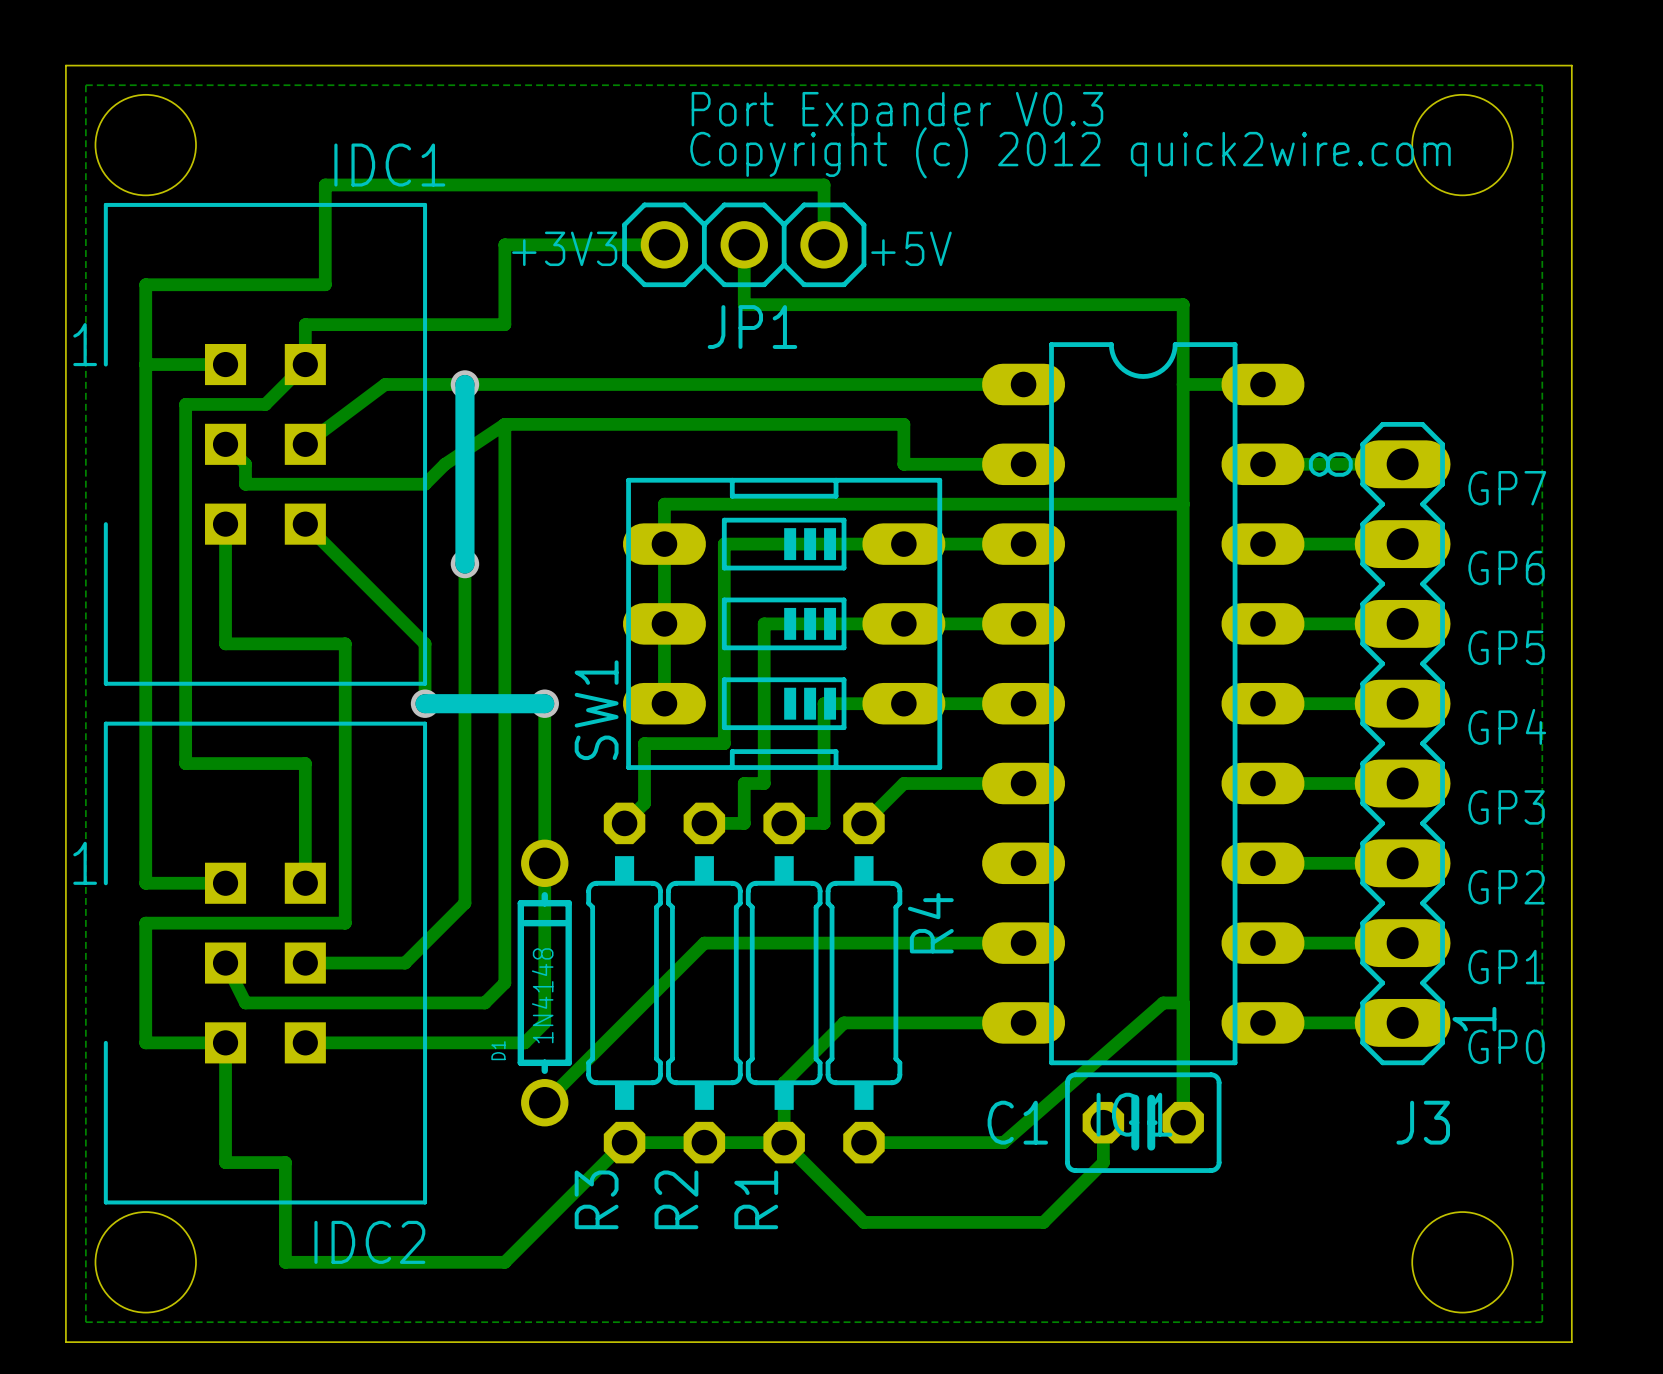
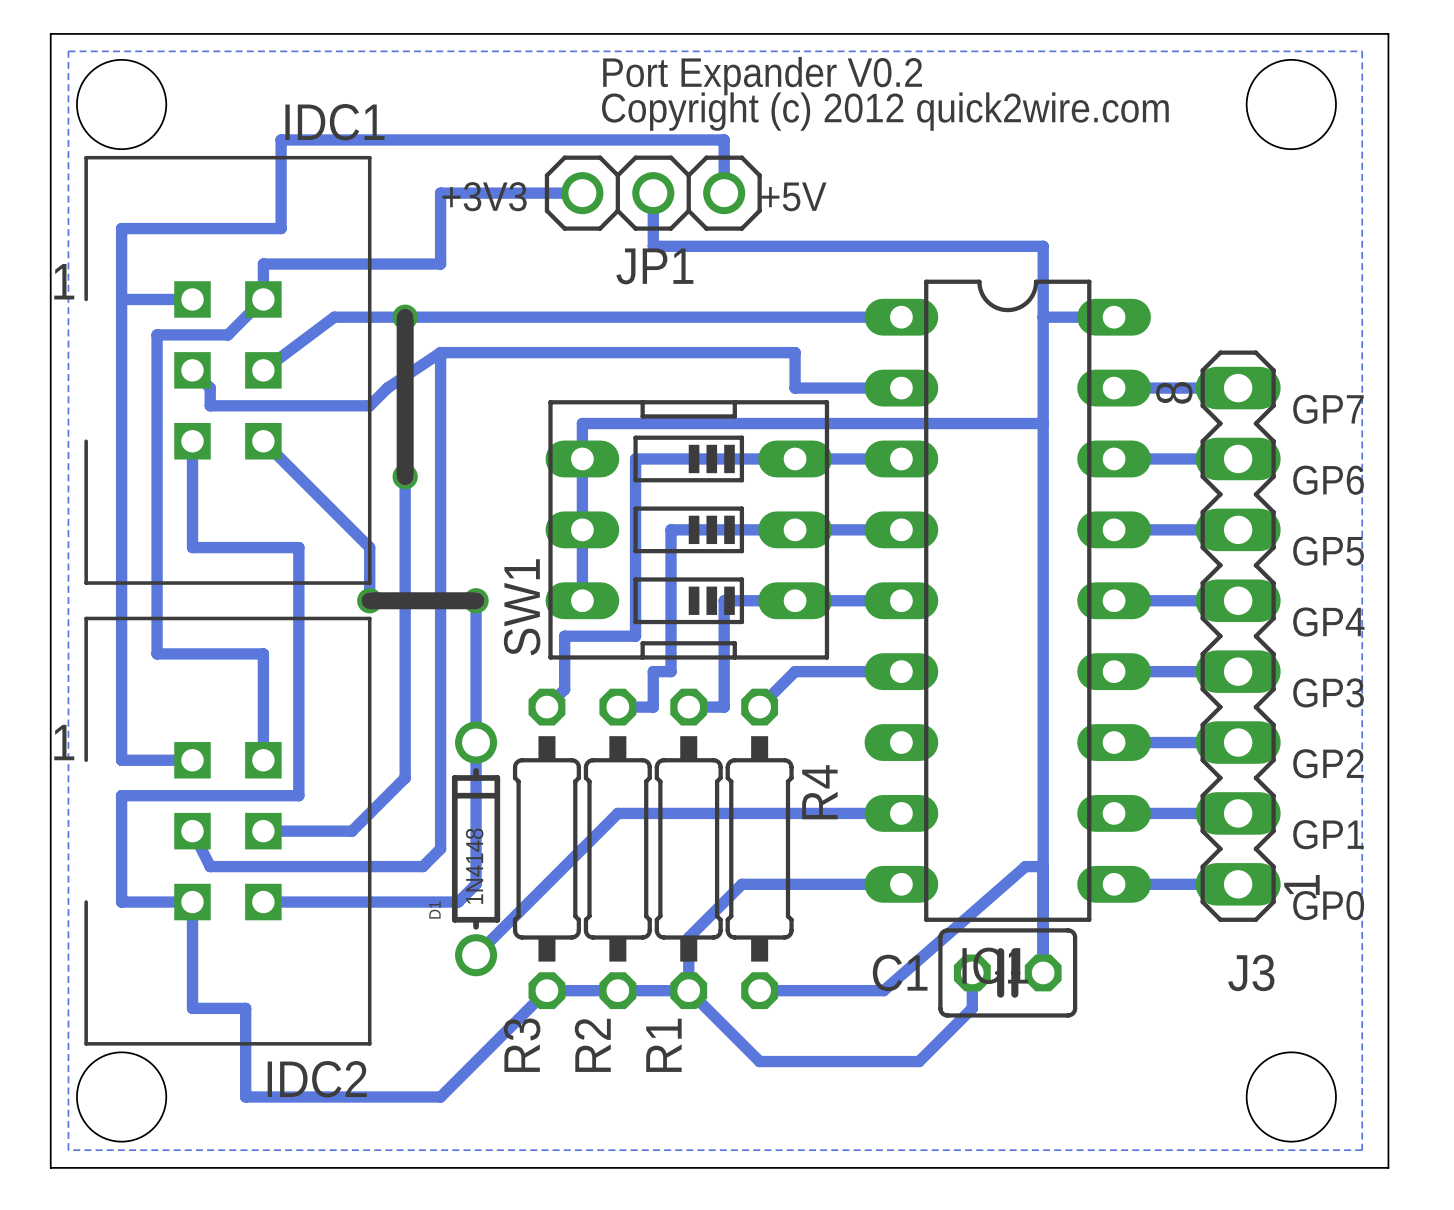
text: Port Expander V0.3 (897, 114) -> Port Expander V0.2 (762, 76)

